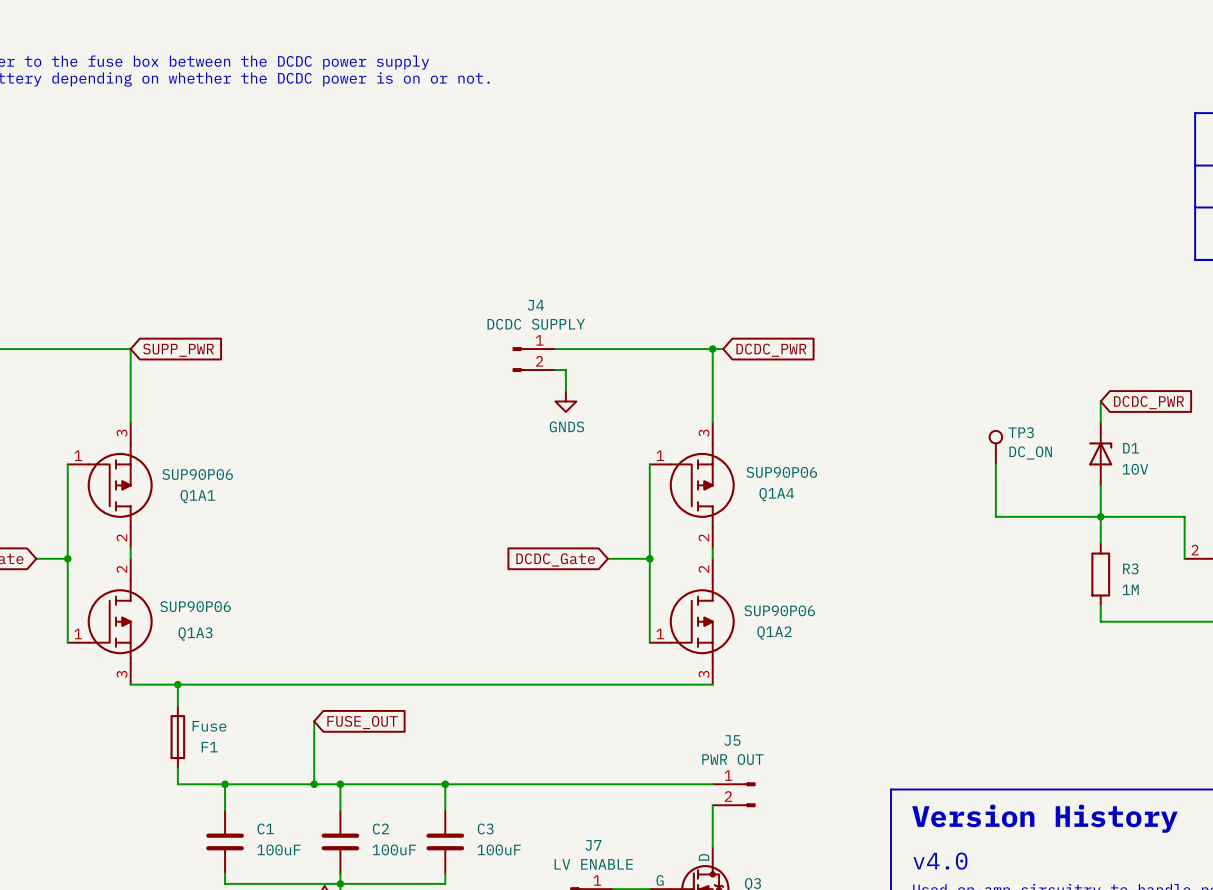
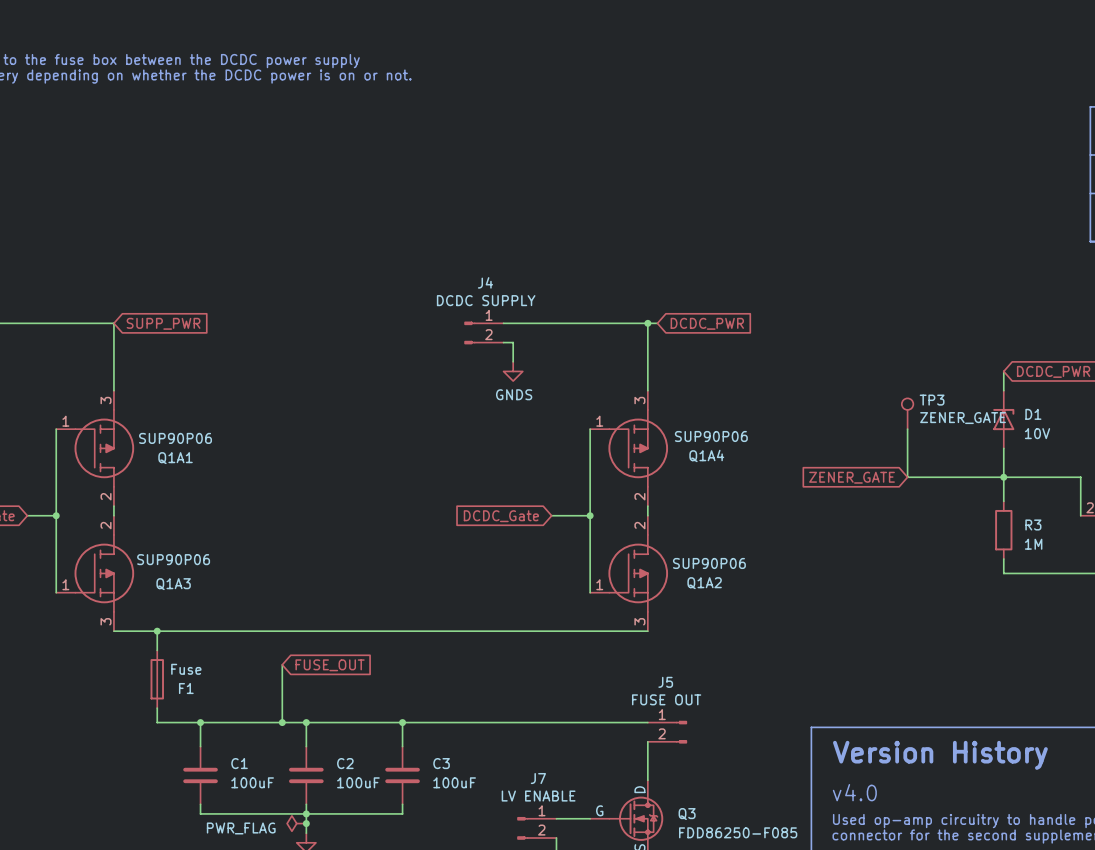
TP3 value: DC_ON (1030, 452) -> ZENER_GATE (963, 418)
global label: none -> ZENER_GATE (852, 477)
J5 value: PWR OUT (732, 759) -> FUSE OUT (666, 699)

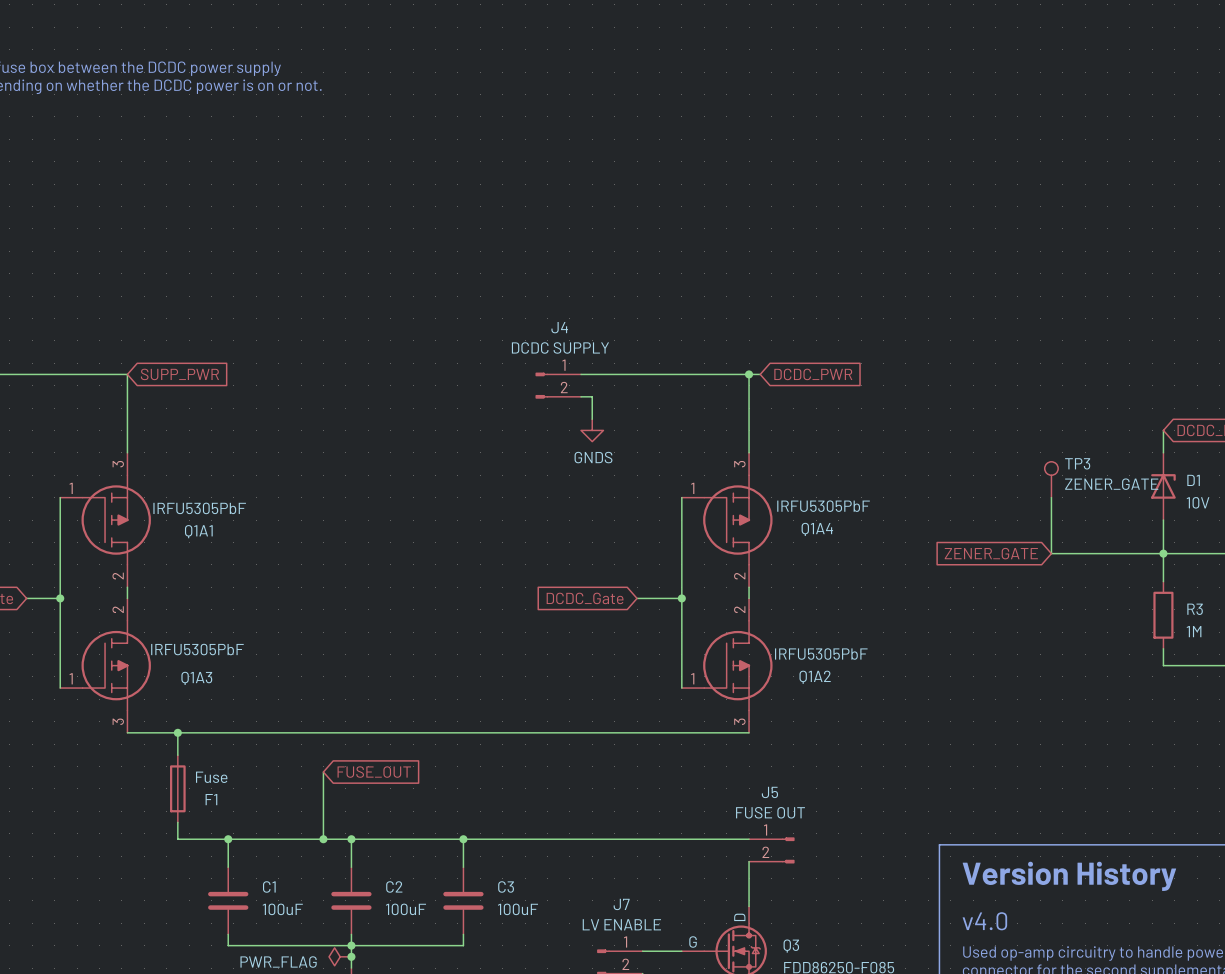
Q1A4 value: SUP90P06 (711, 436) -> IRFU5305PbF (823, 506)
Q1A1 value: SUP90P06 (175, 438) -> IRFU5305PbF (199, 508)
Q1A3 value: SUP90P06 (173, 559) -> IRFU5305PbF (197, 649)
Q1A2 value: SUP90P06 (709, 563) -> IRFU5305PbF (821, 654)

